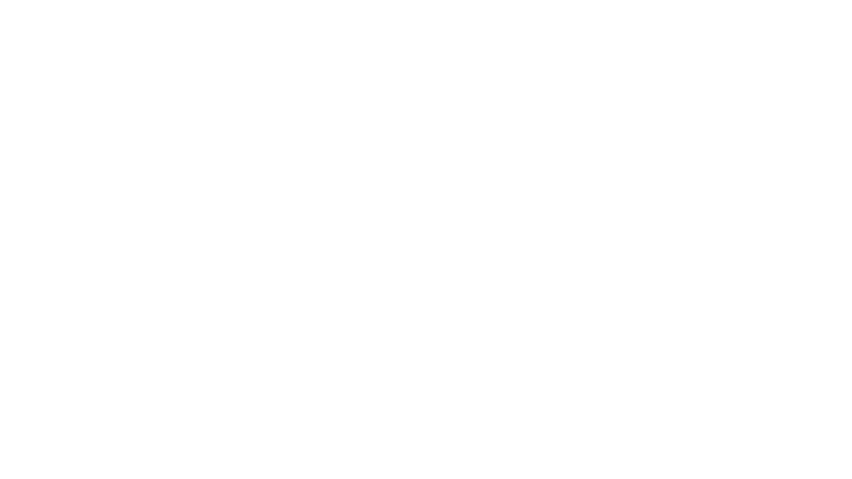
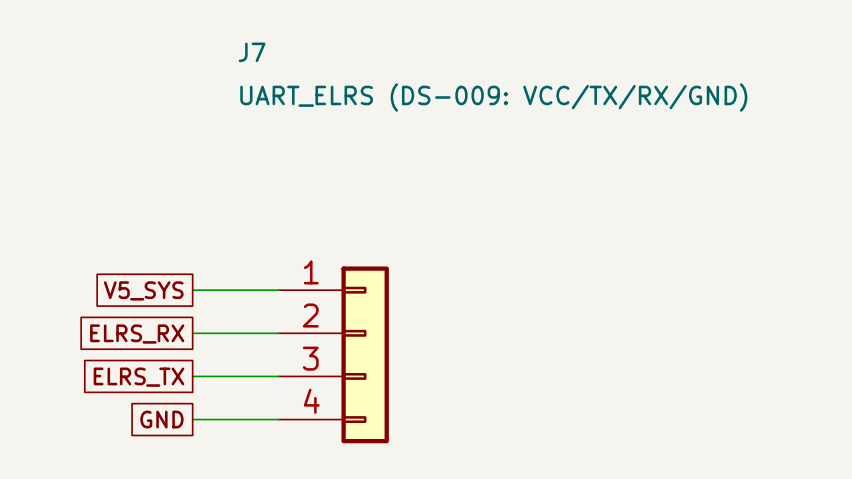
global label: none -> V5_SYS (143, 290)
wire: none -> (192, 290) (278, 290)
wire: none -> (192, 333) (278, 333)
global label: none -> ELRS_RX (137, 334)
J7: none -> UART_ELRS (DS-009: VCC/TX/RX/GND) (333, 354)
wire: none -> (192, 376) (278, 376)
global label: none -> ELRS_TX (139, 377)
global label: none -> GND (161, 419)
wire: none -> (192, 419) (278, 419)

